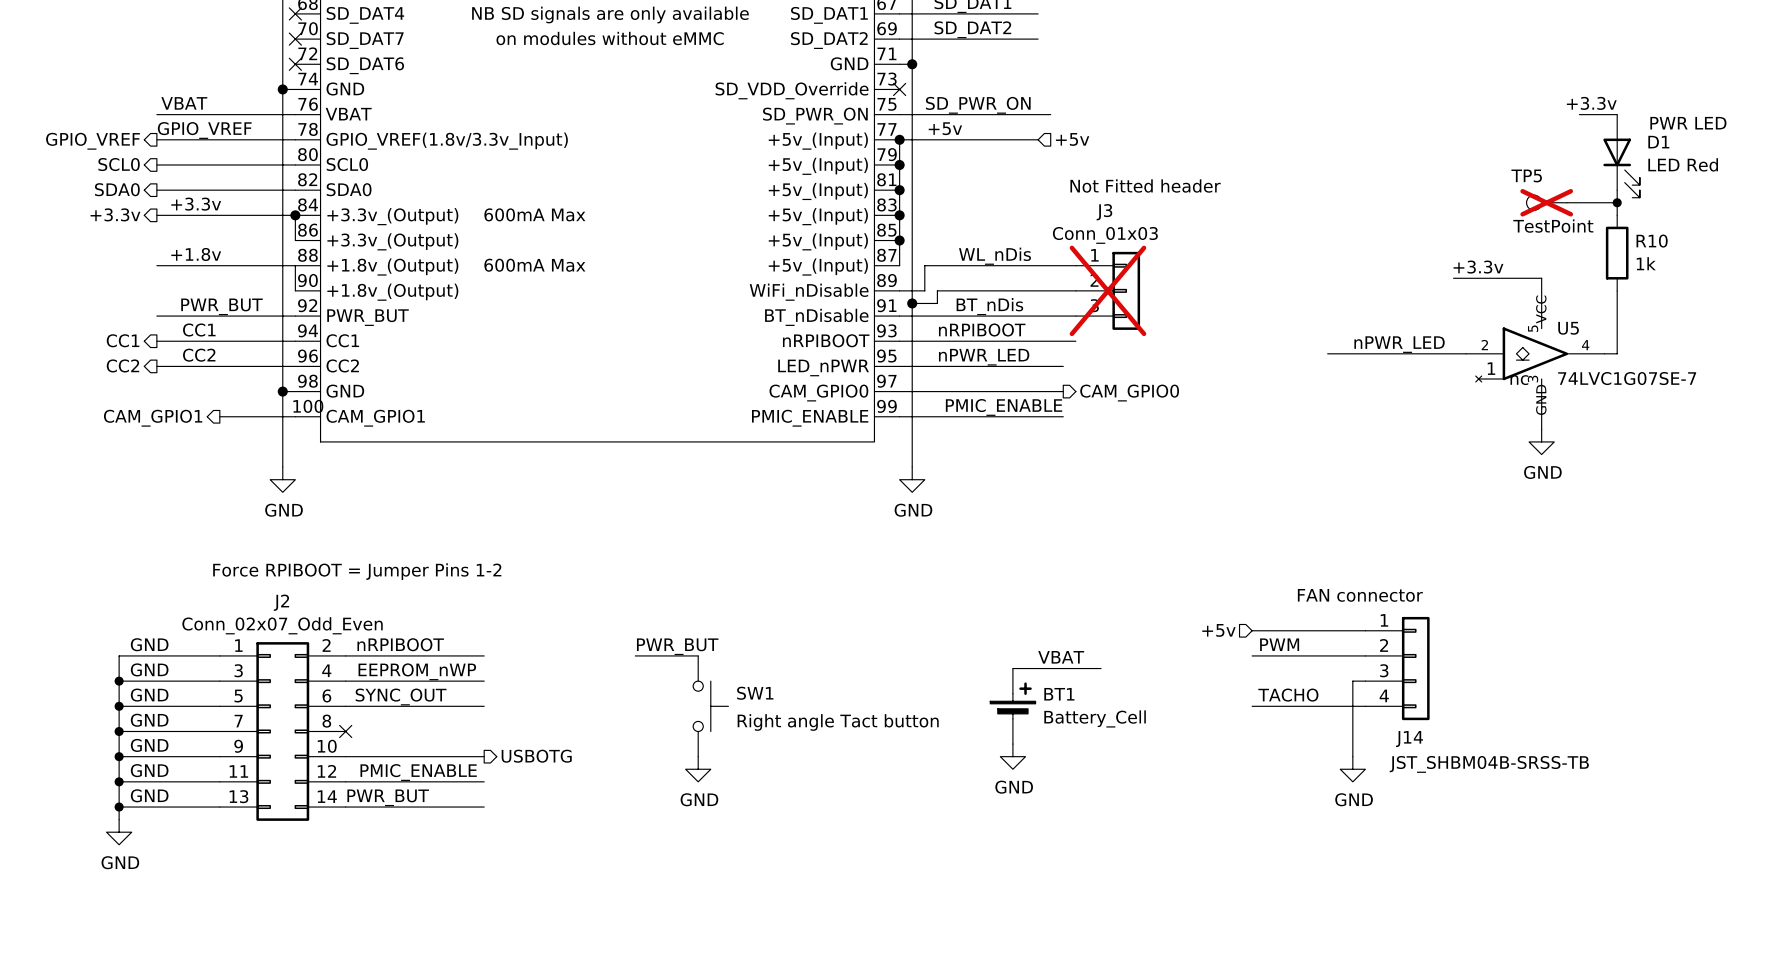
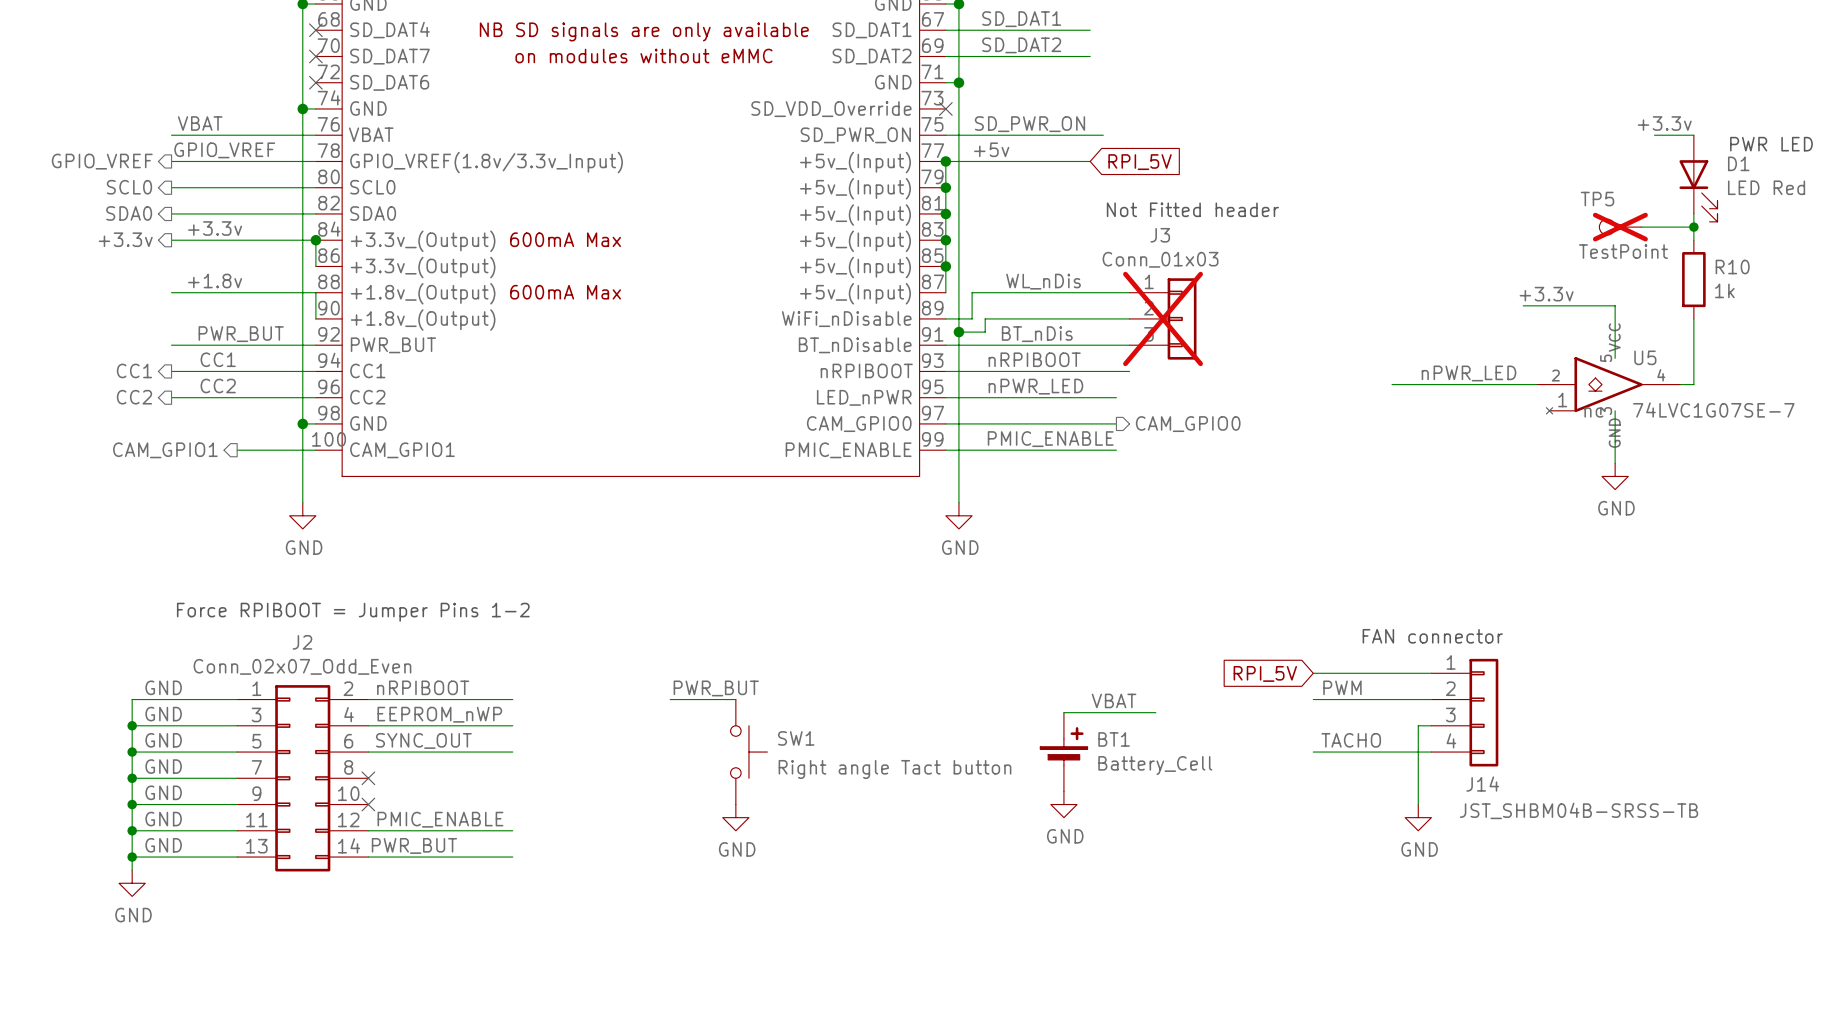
hierarchical label: +5v (1072, 139) -> none
global label: none -> RPI_5V (1140, 162)
hierarchical label: +5v (1218, 630) -> none
global label: none -> RPI_5V (1265, 673)
wire: (345, 756) (484, 756) -> none
no-connect mark: none -> (368, 804)
hierarchical label: USBOTG (536, 756) -> none

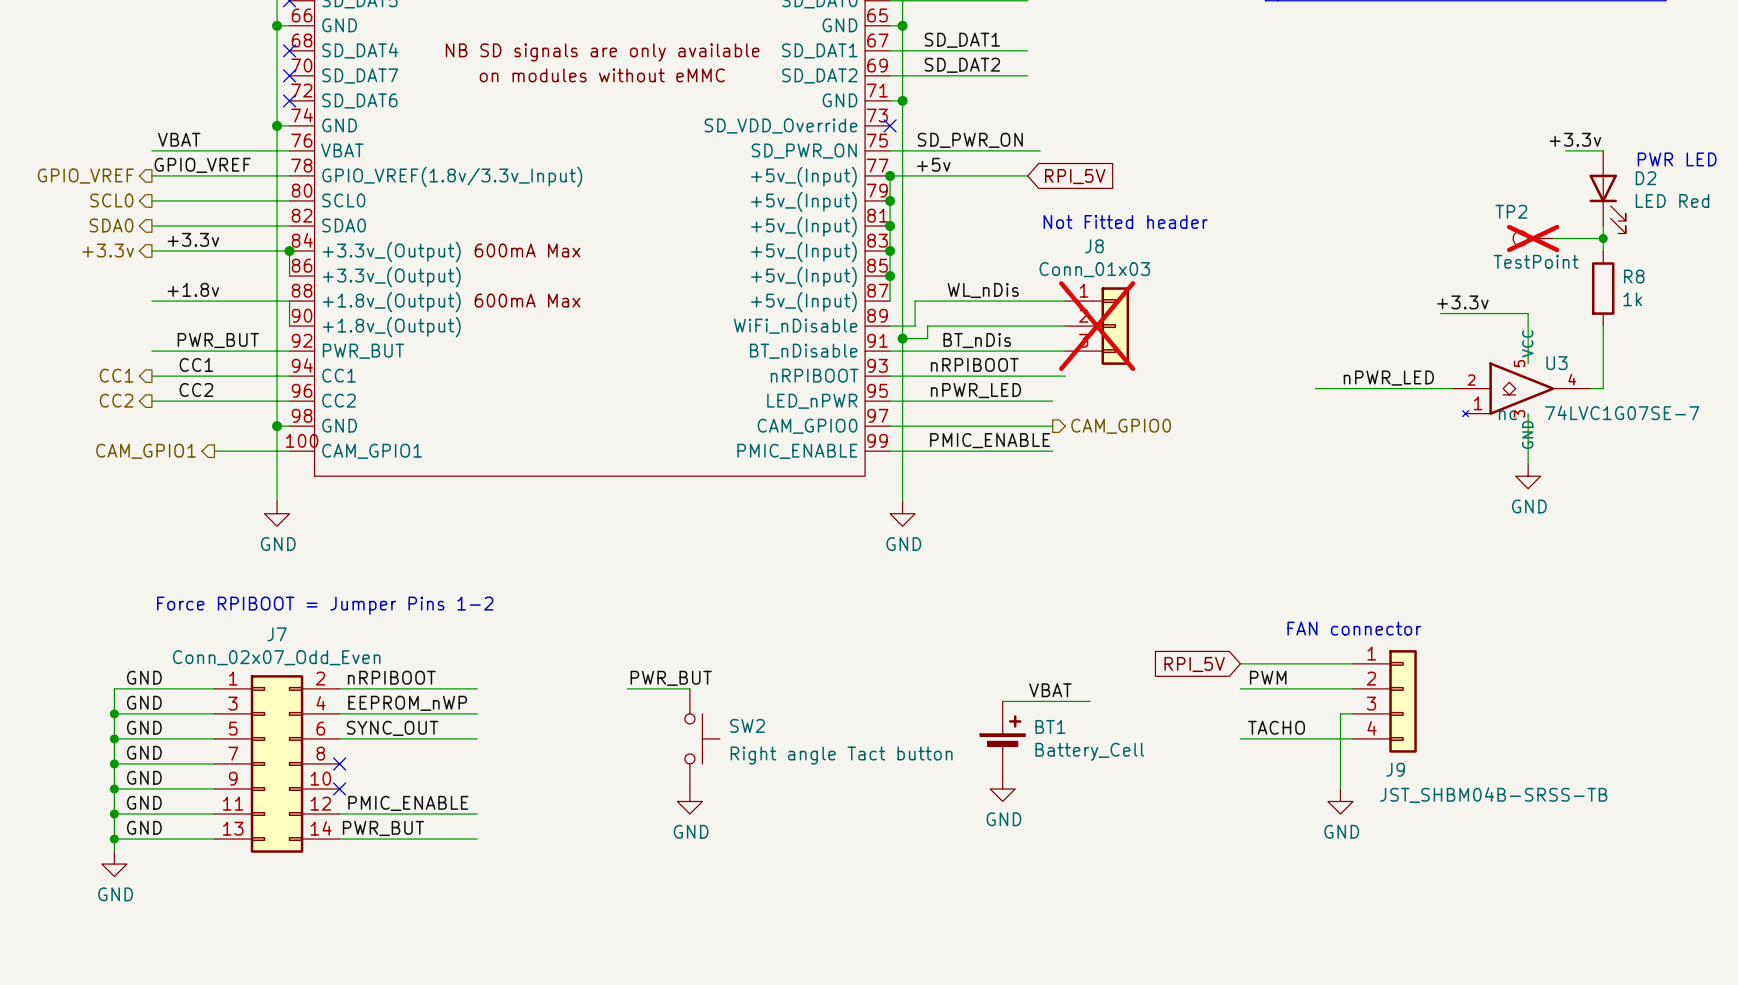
D1 name: D1 (1738, 163) -> D2 (1645, 178)
TP5 name: TP5 (1597, 199) -> TP2 (1511, 211)
J3 name: J3 (1160, 235) -> J8 (1094, 246)
R10 name: R10 (1732, 267) -> R8 (1634, 276)
U5 name: U5 (1645, 357) -> U3 (1556, 363)
J2 name: J2 (302, 642) -> J7 (277, 634)
SW1 name: SW1 (796, 738) -> SW2 (747, 725)
J14 name: J14 (1482, 784) -> J9 (1395, 769)

